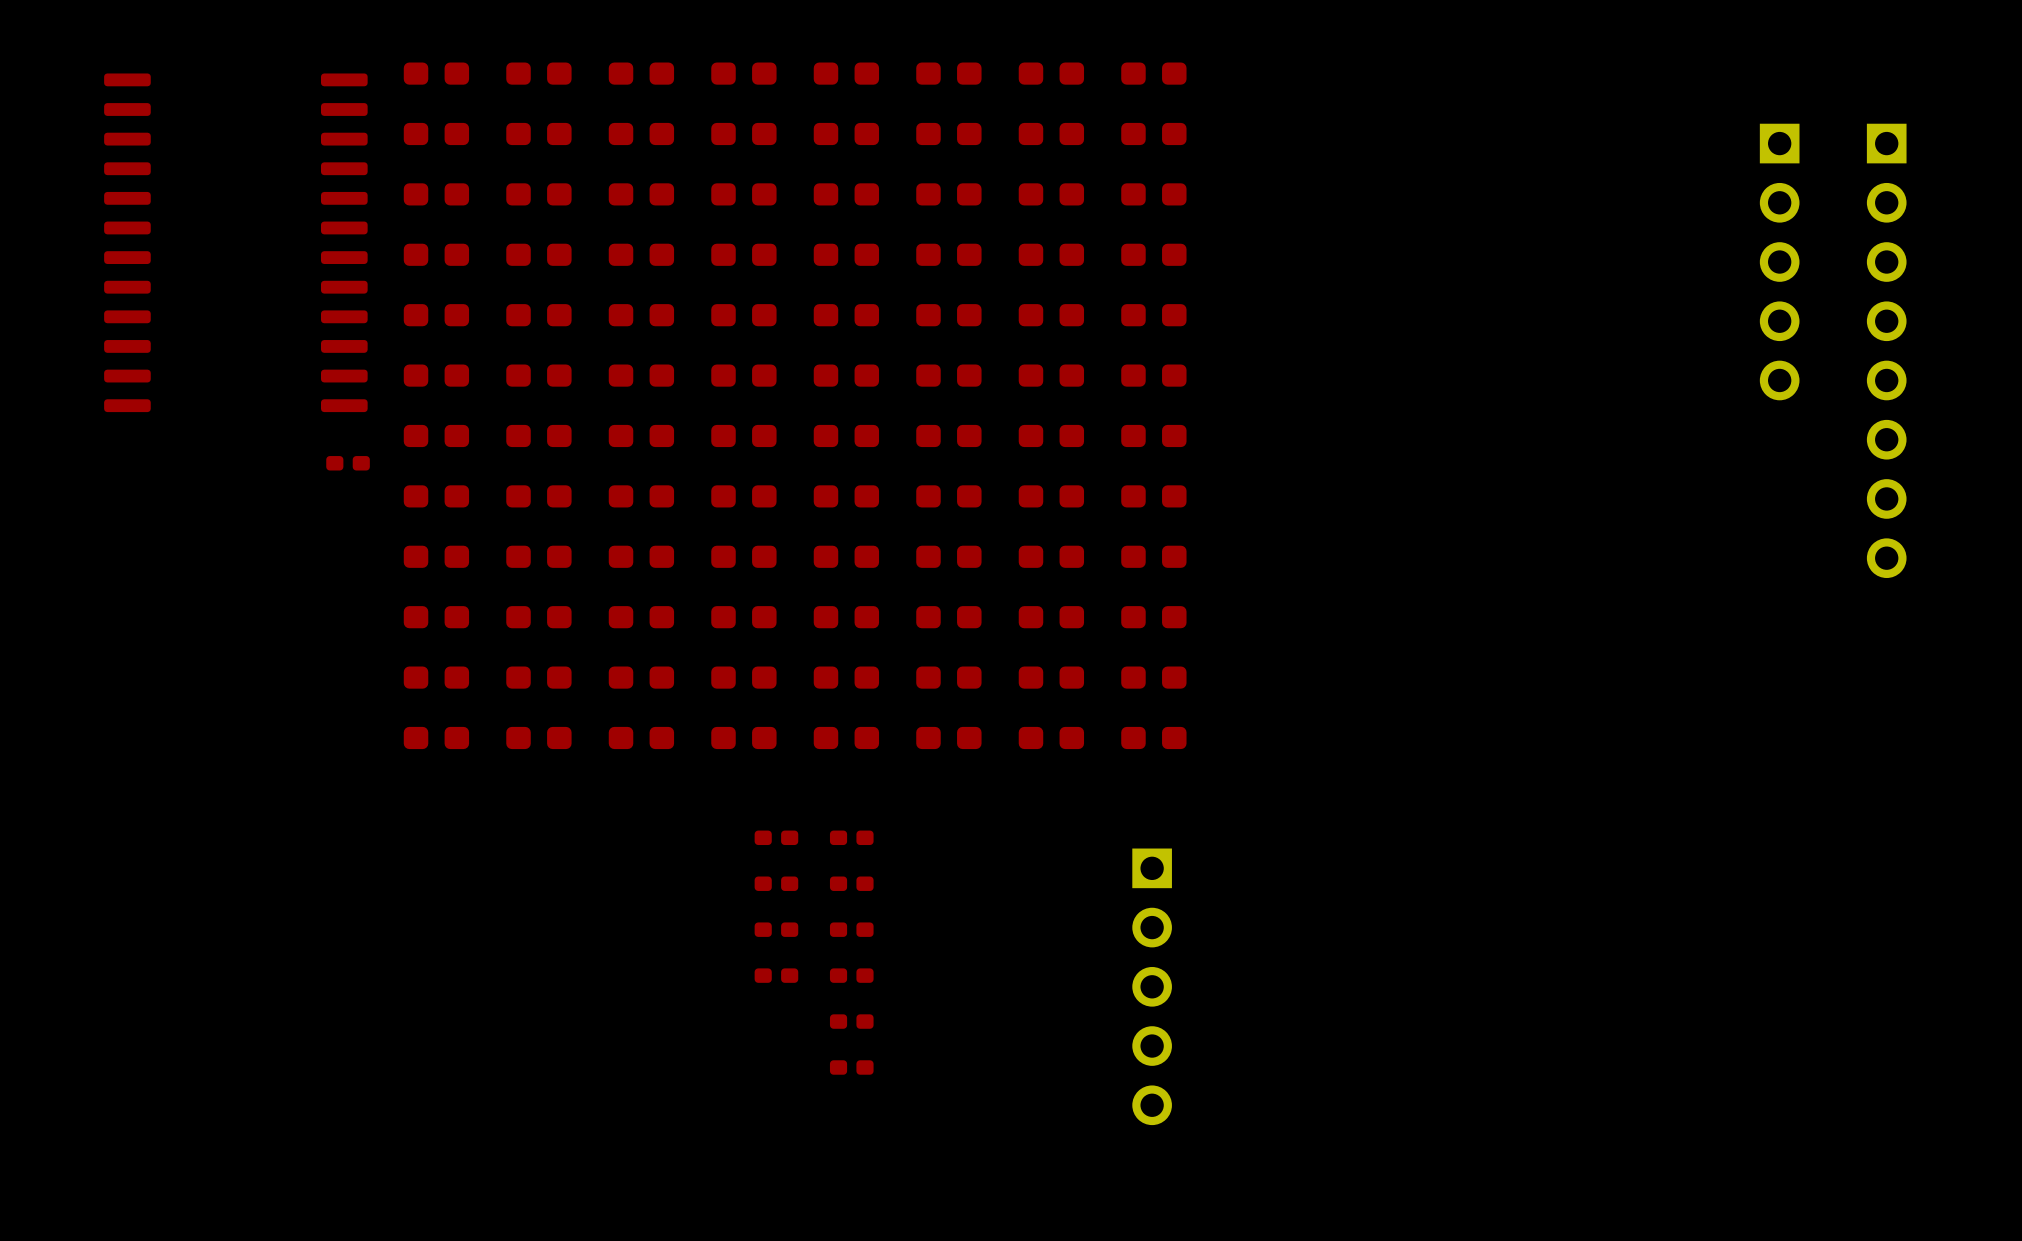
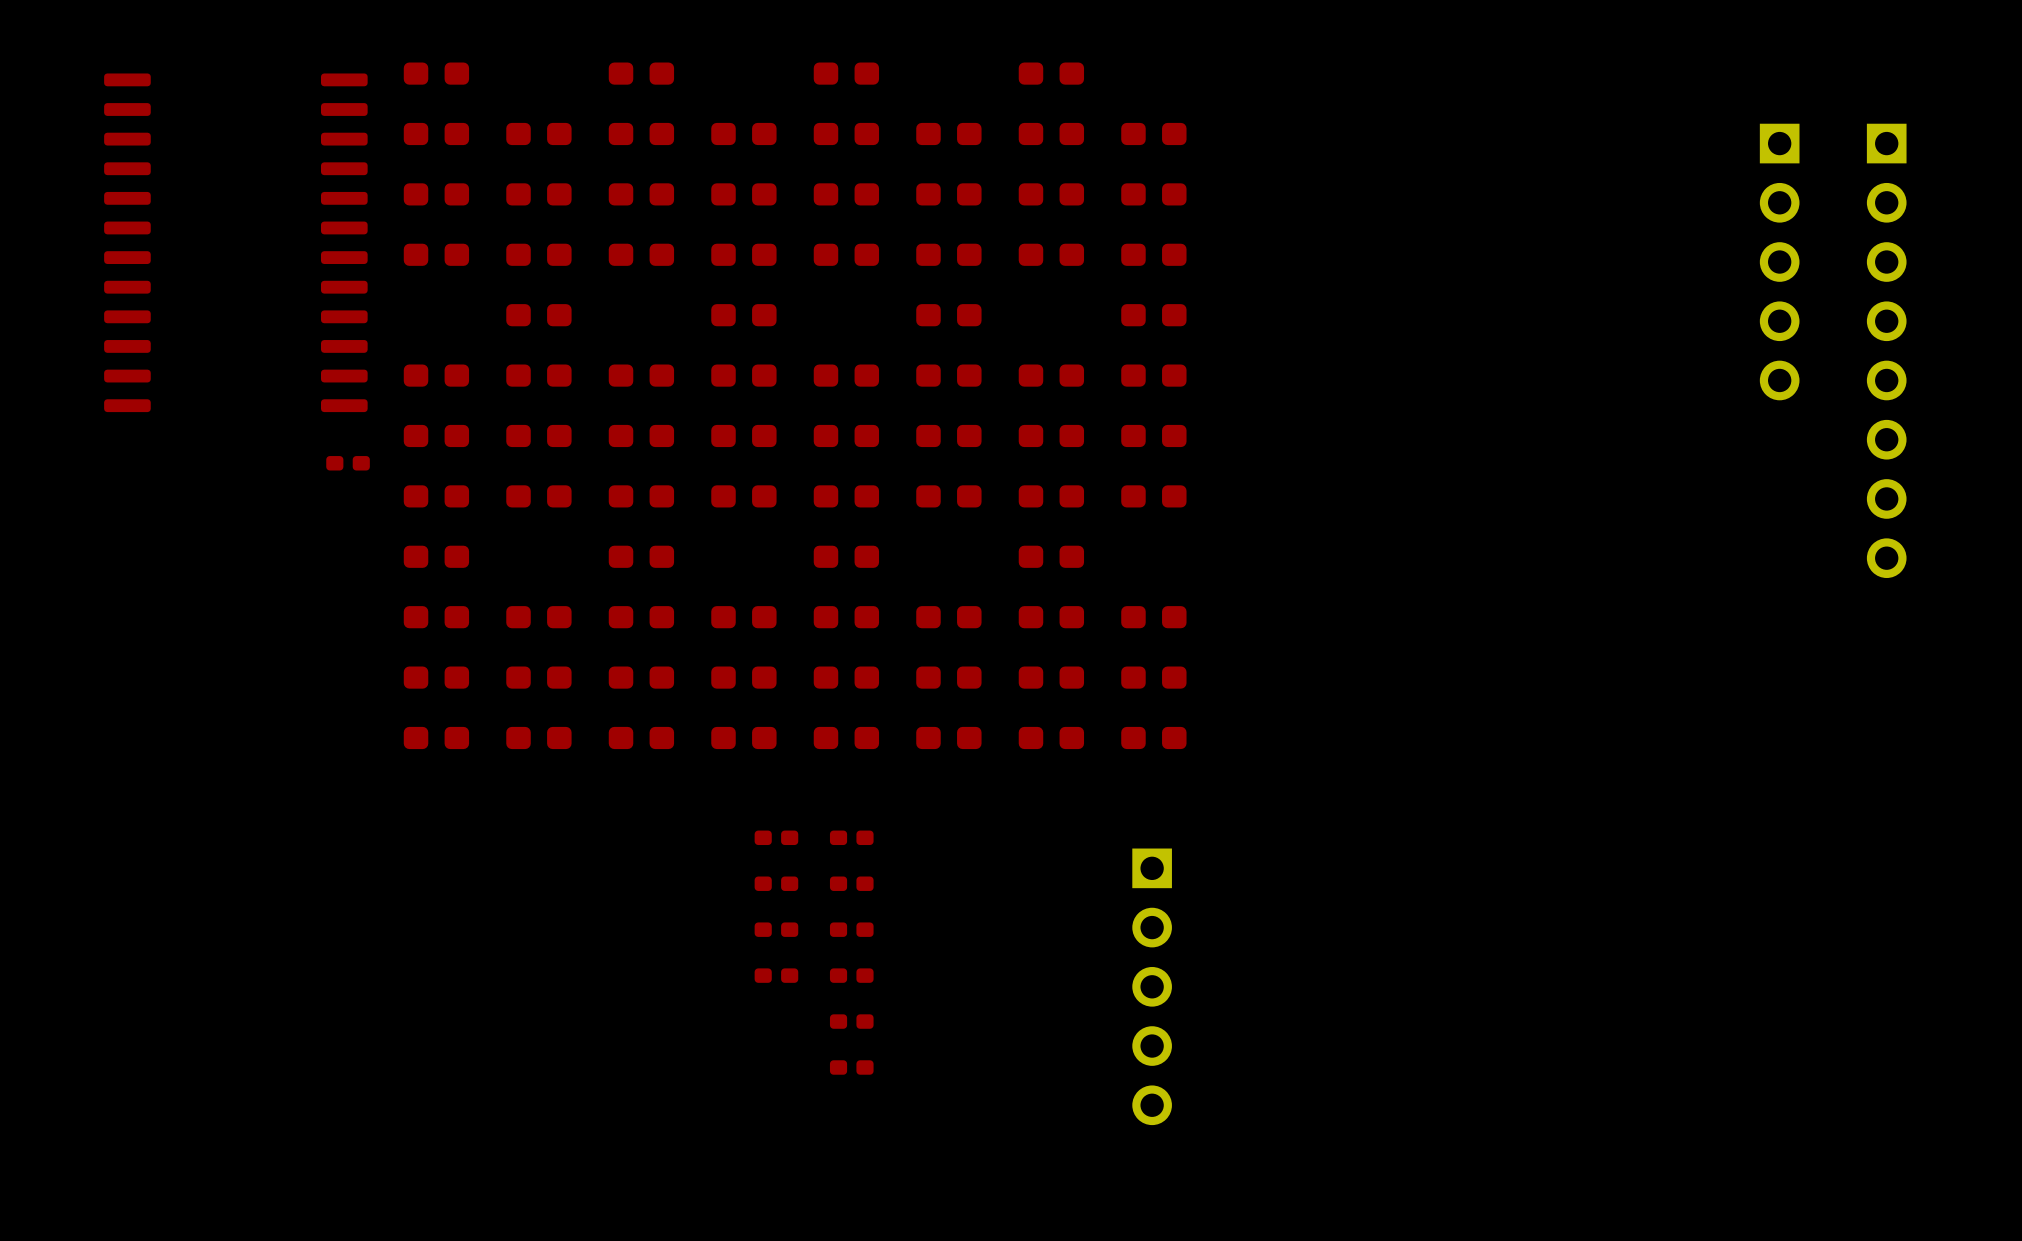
part: (538, 73) -> none
part: (743, 73) -> none
part: (948, 73) -> none
part: (1153, 73) -> none
part: (436, 315) -> none
part: (641, 315) -> none
part: (846, 315) -> none
part: (1051, 315) -> none
part: (538, 556) -> none
part: (743, 556) -> none
part: (948, 556) -> none
part: (1153, 556) -> none

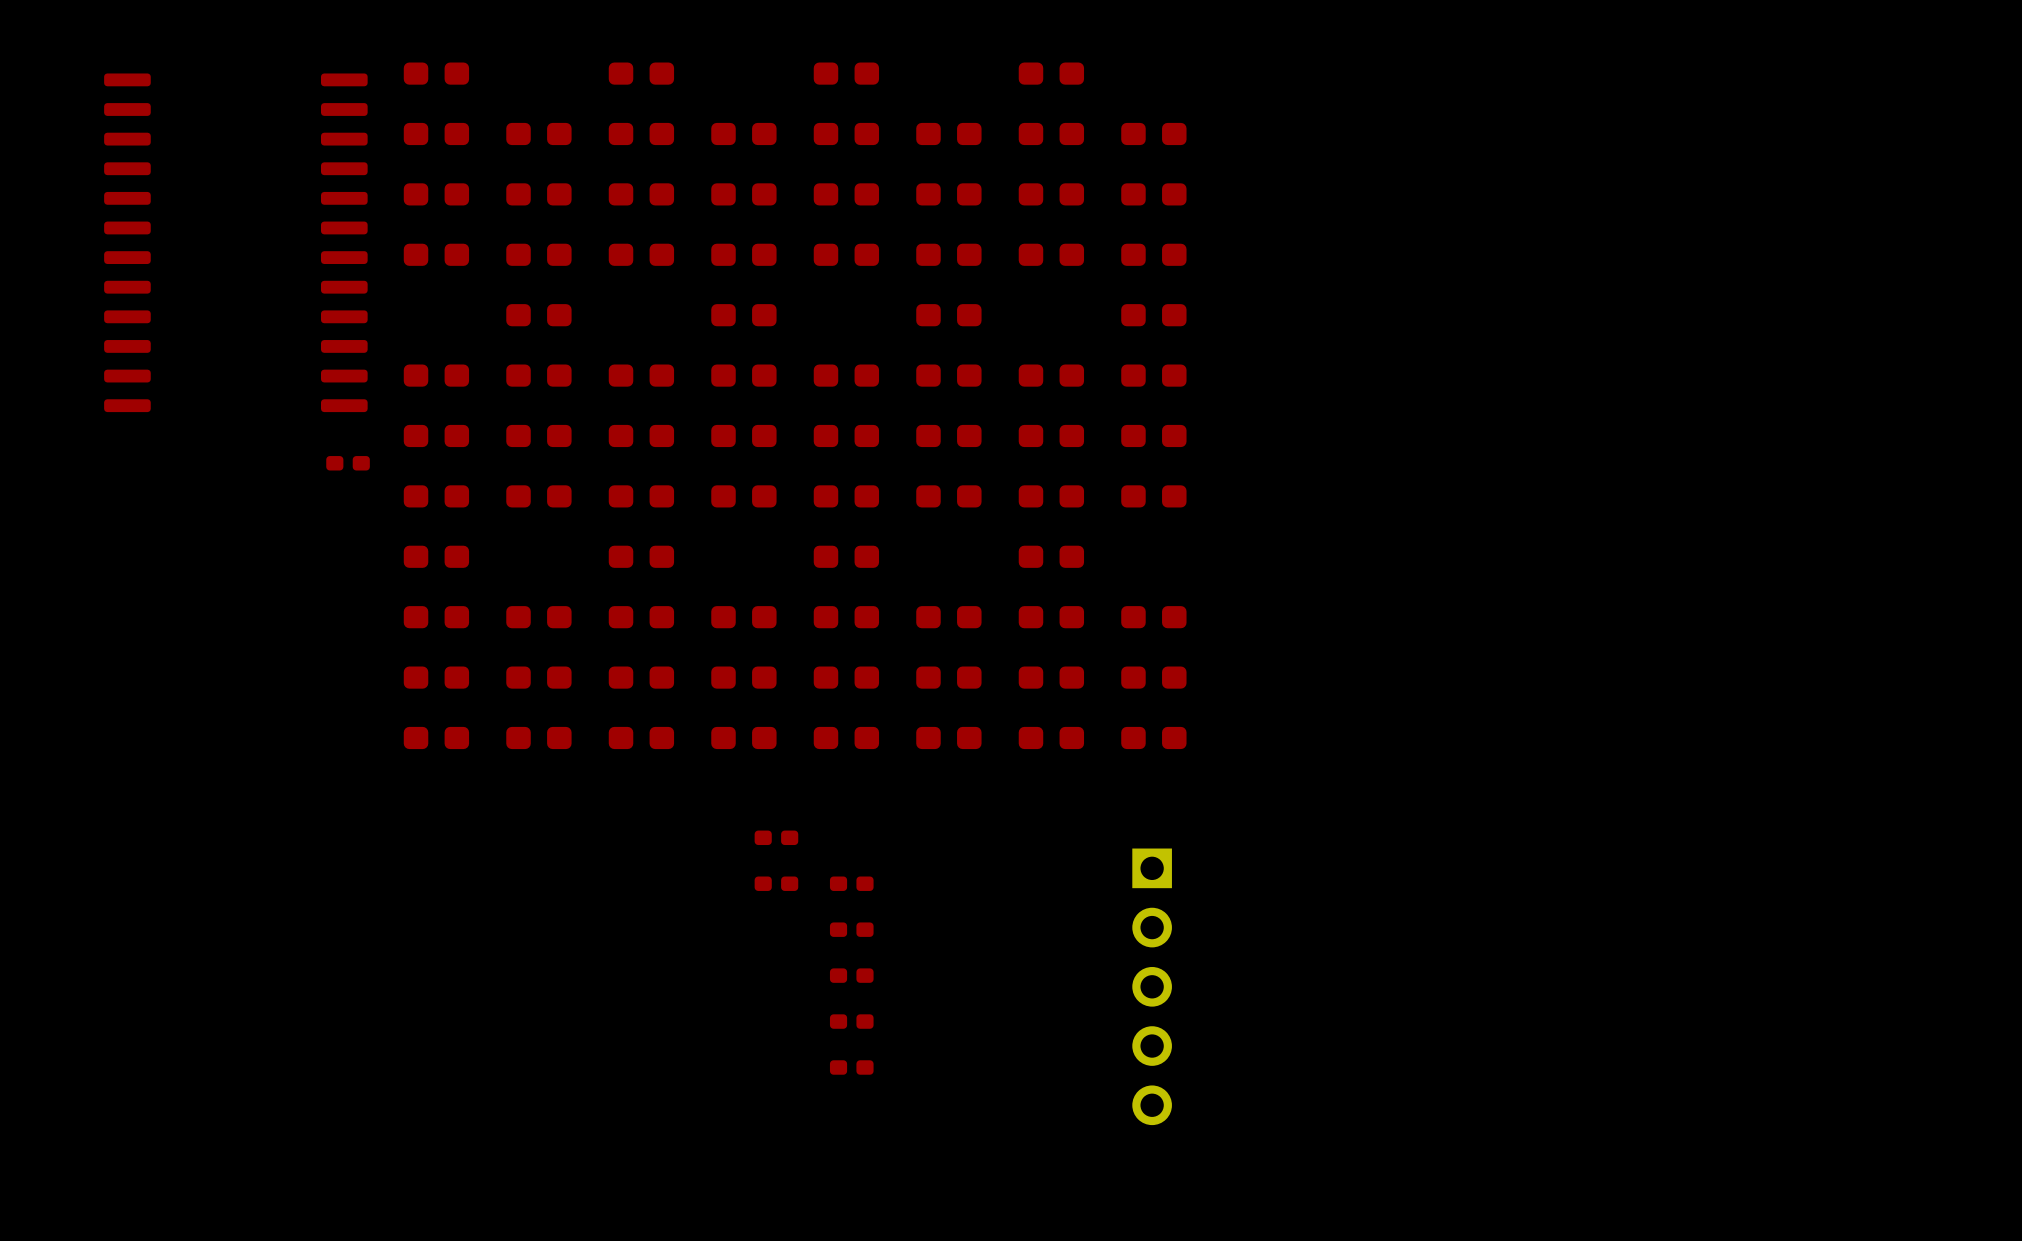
part: (1779, 262) -> none
part: (1886, 350) -> none
part: (851, 837) -> none
part: (776, 929) -> none
part: (776, 975) -> none

